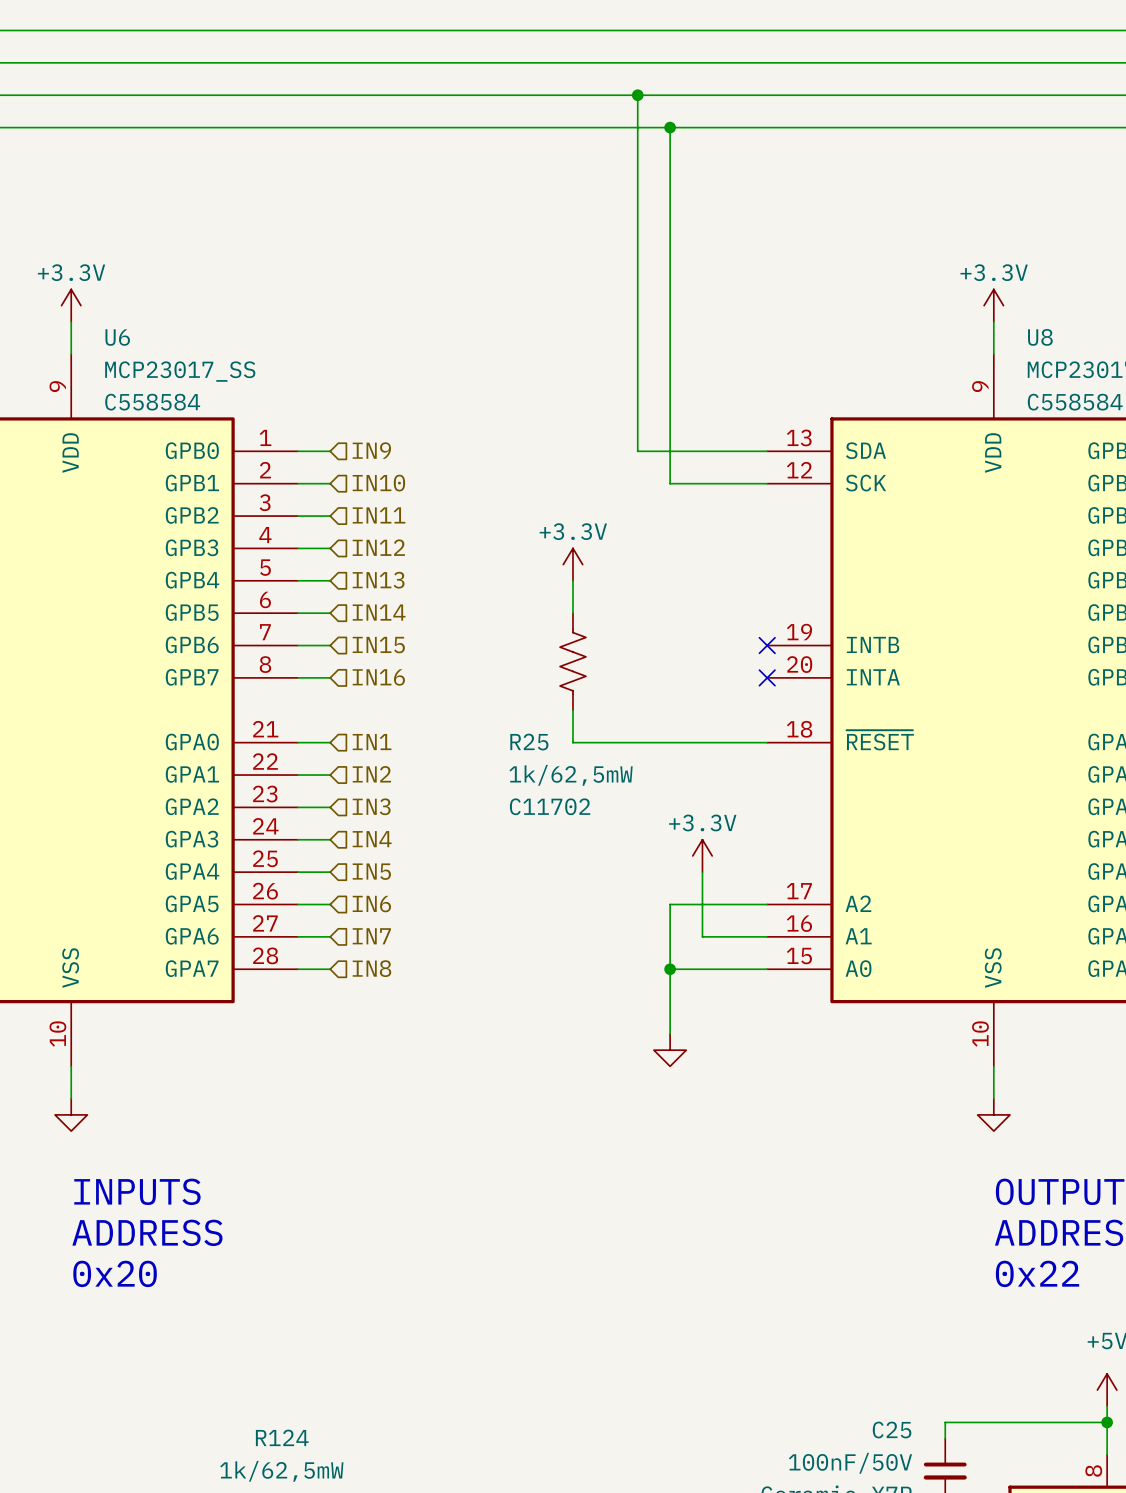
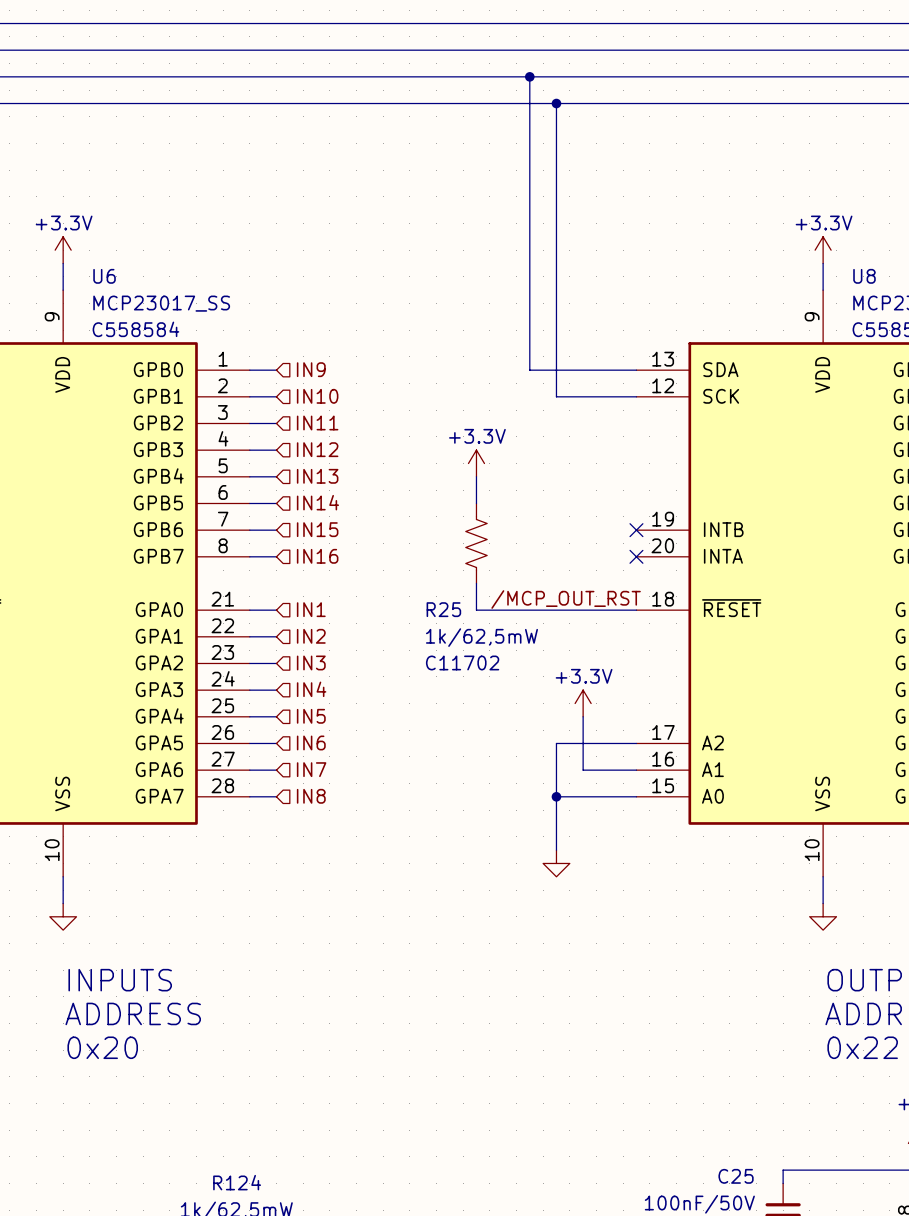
label: none -> /MCP_OUT_RST (566, 599)

